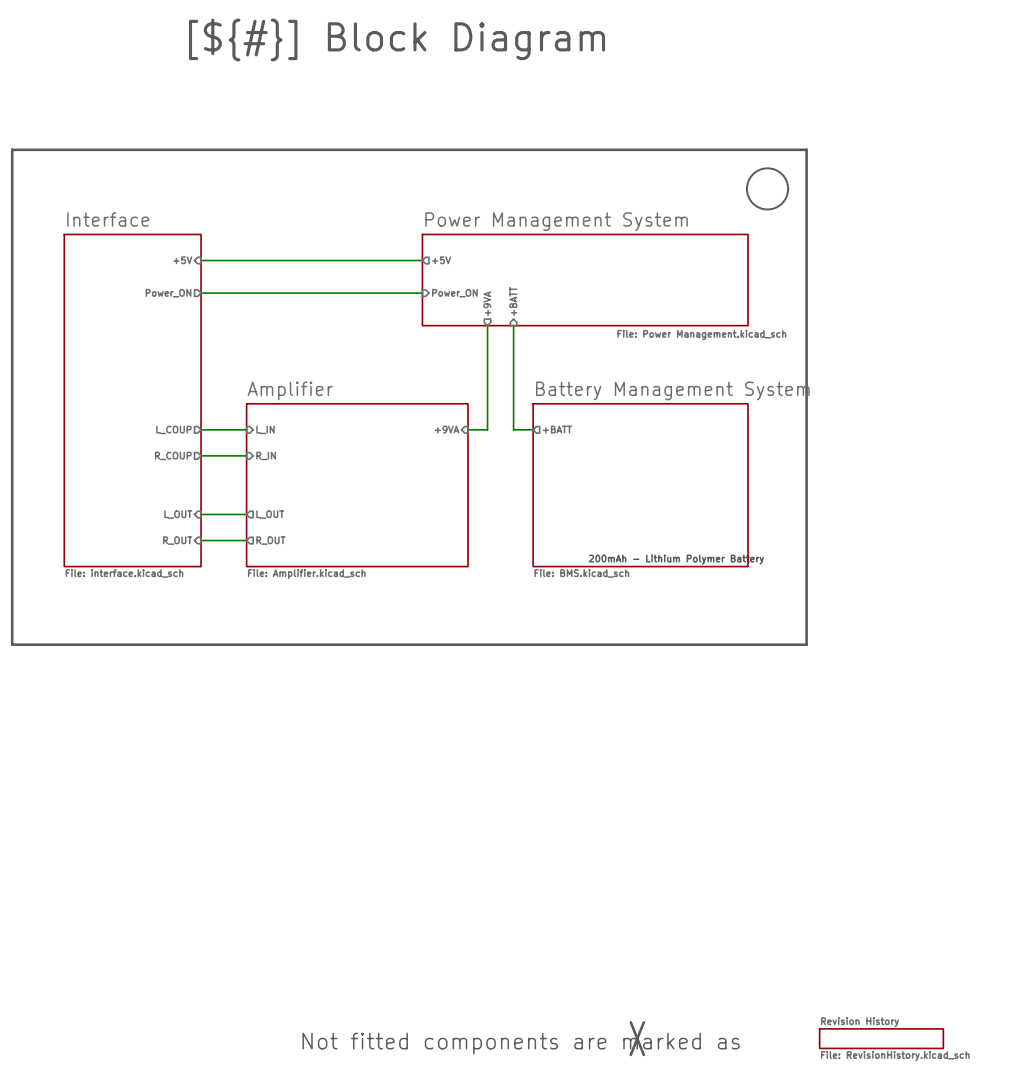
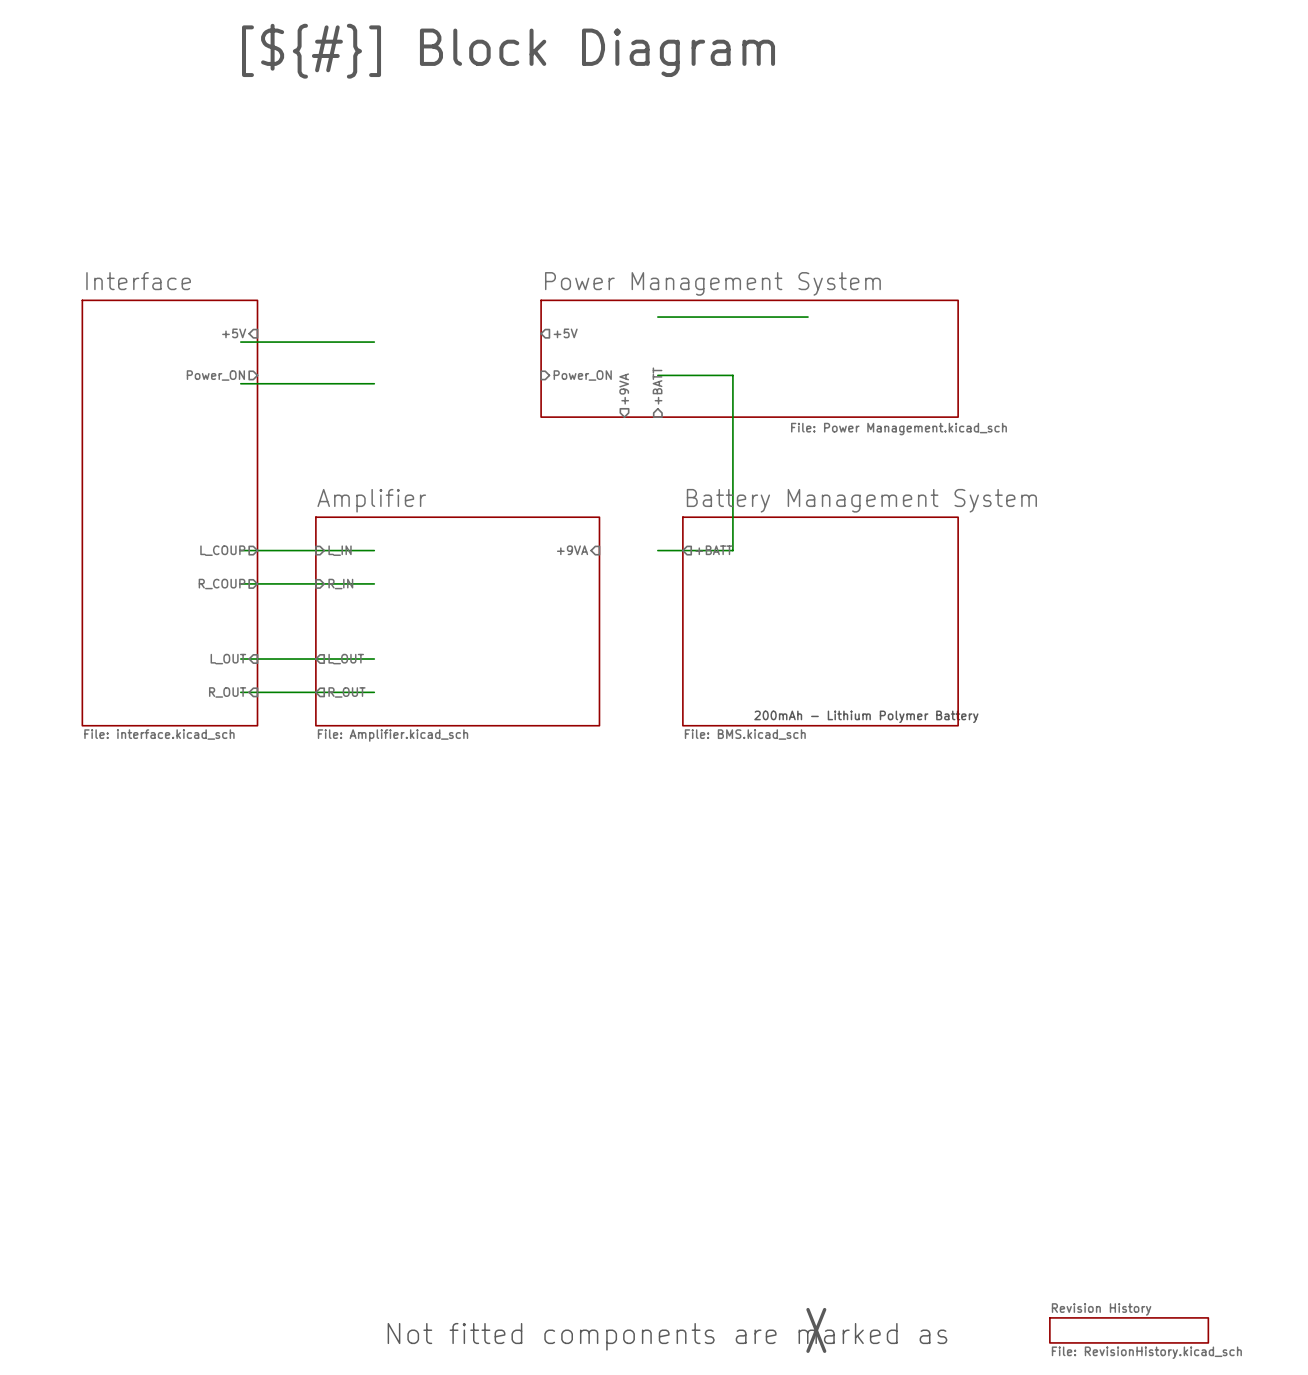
line: (12, 149) (806, 149) (806, 644) (12, 644) (12, 149) -> none
drawing: [745, 167, 790, 211] -> none
wire: none -> (657, 317) (807, 317)
wire: (201, 260) (422, 260) -> none
wire: none -> (240, 342) (374, 342)
wire: (201, 293) (422, 293) -> none
wire: none -> (657, 375) (732, 375) (732, 550) (682, 550)
wire: none -> (240, 383) (374, 383)
wire: (487, 325) (487, 429) (468, 429) -> none
wire: (513, 325) (513, 429) -> none
wire: none -> (240, 550) (257, 550)
wire: none -> (315, 550) (374, 550)
wire: none -> (240, 583) (257, 583)
wire: none -> (315, 583) (374, 583)
wire: none -> (240, 659) (257, 659)
wire: none -> (315, 659) (374, 659)
wire: none -> (240, 692) (257, 692)
wire: none -> (315, 692) (374, 692)

